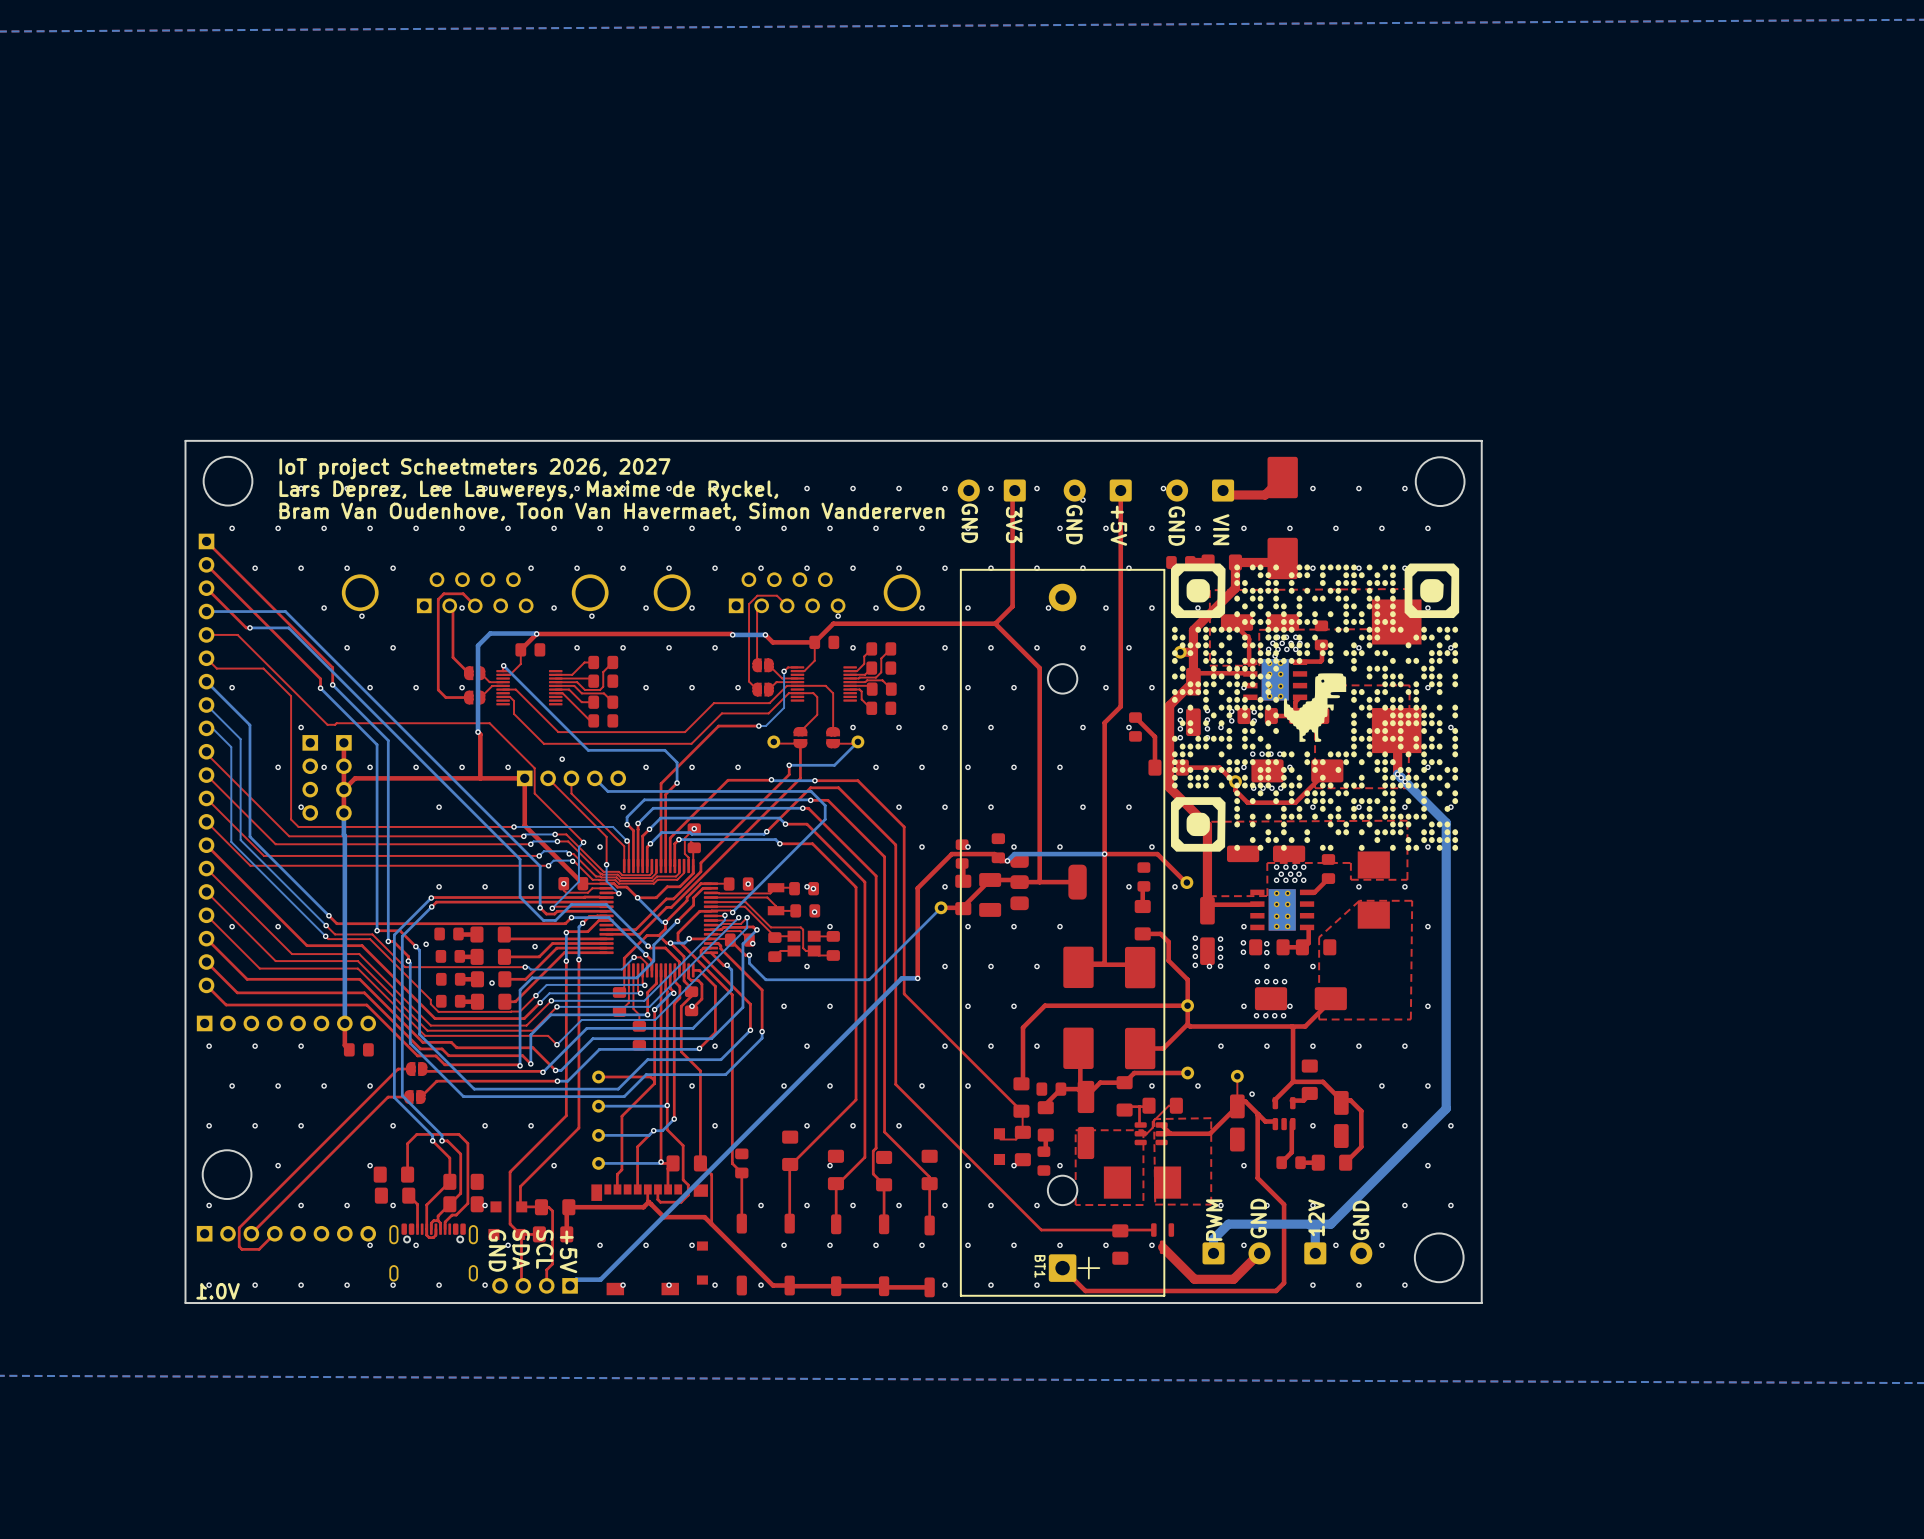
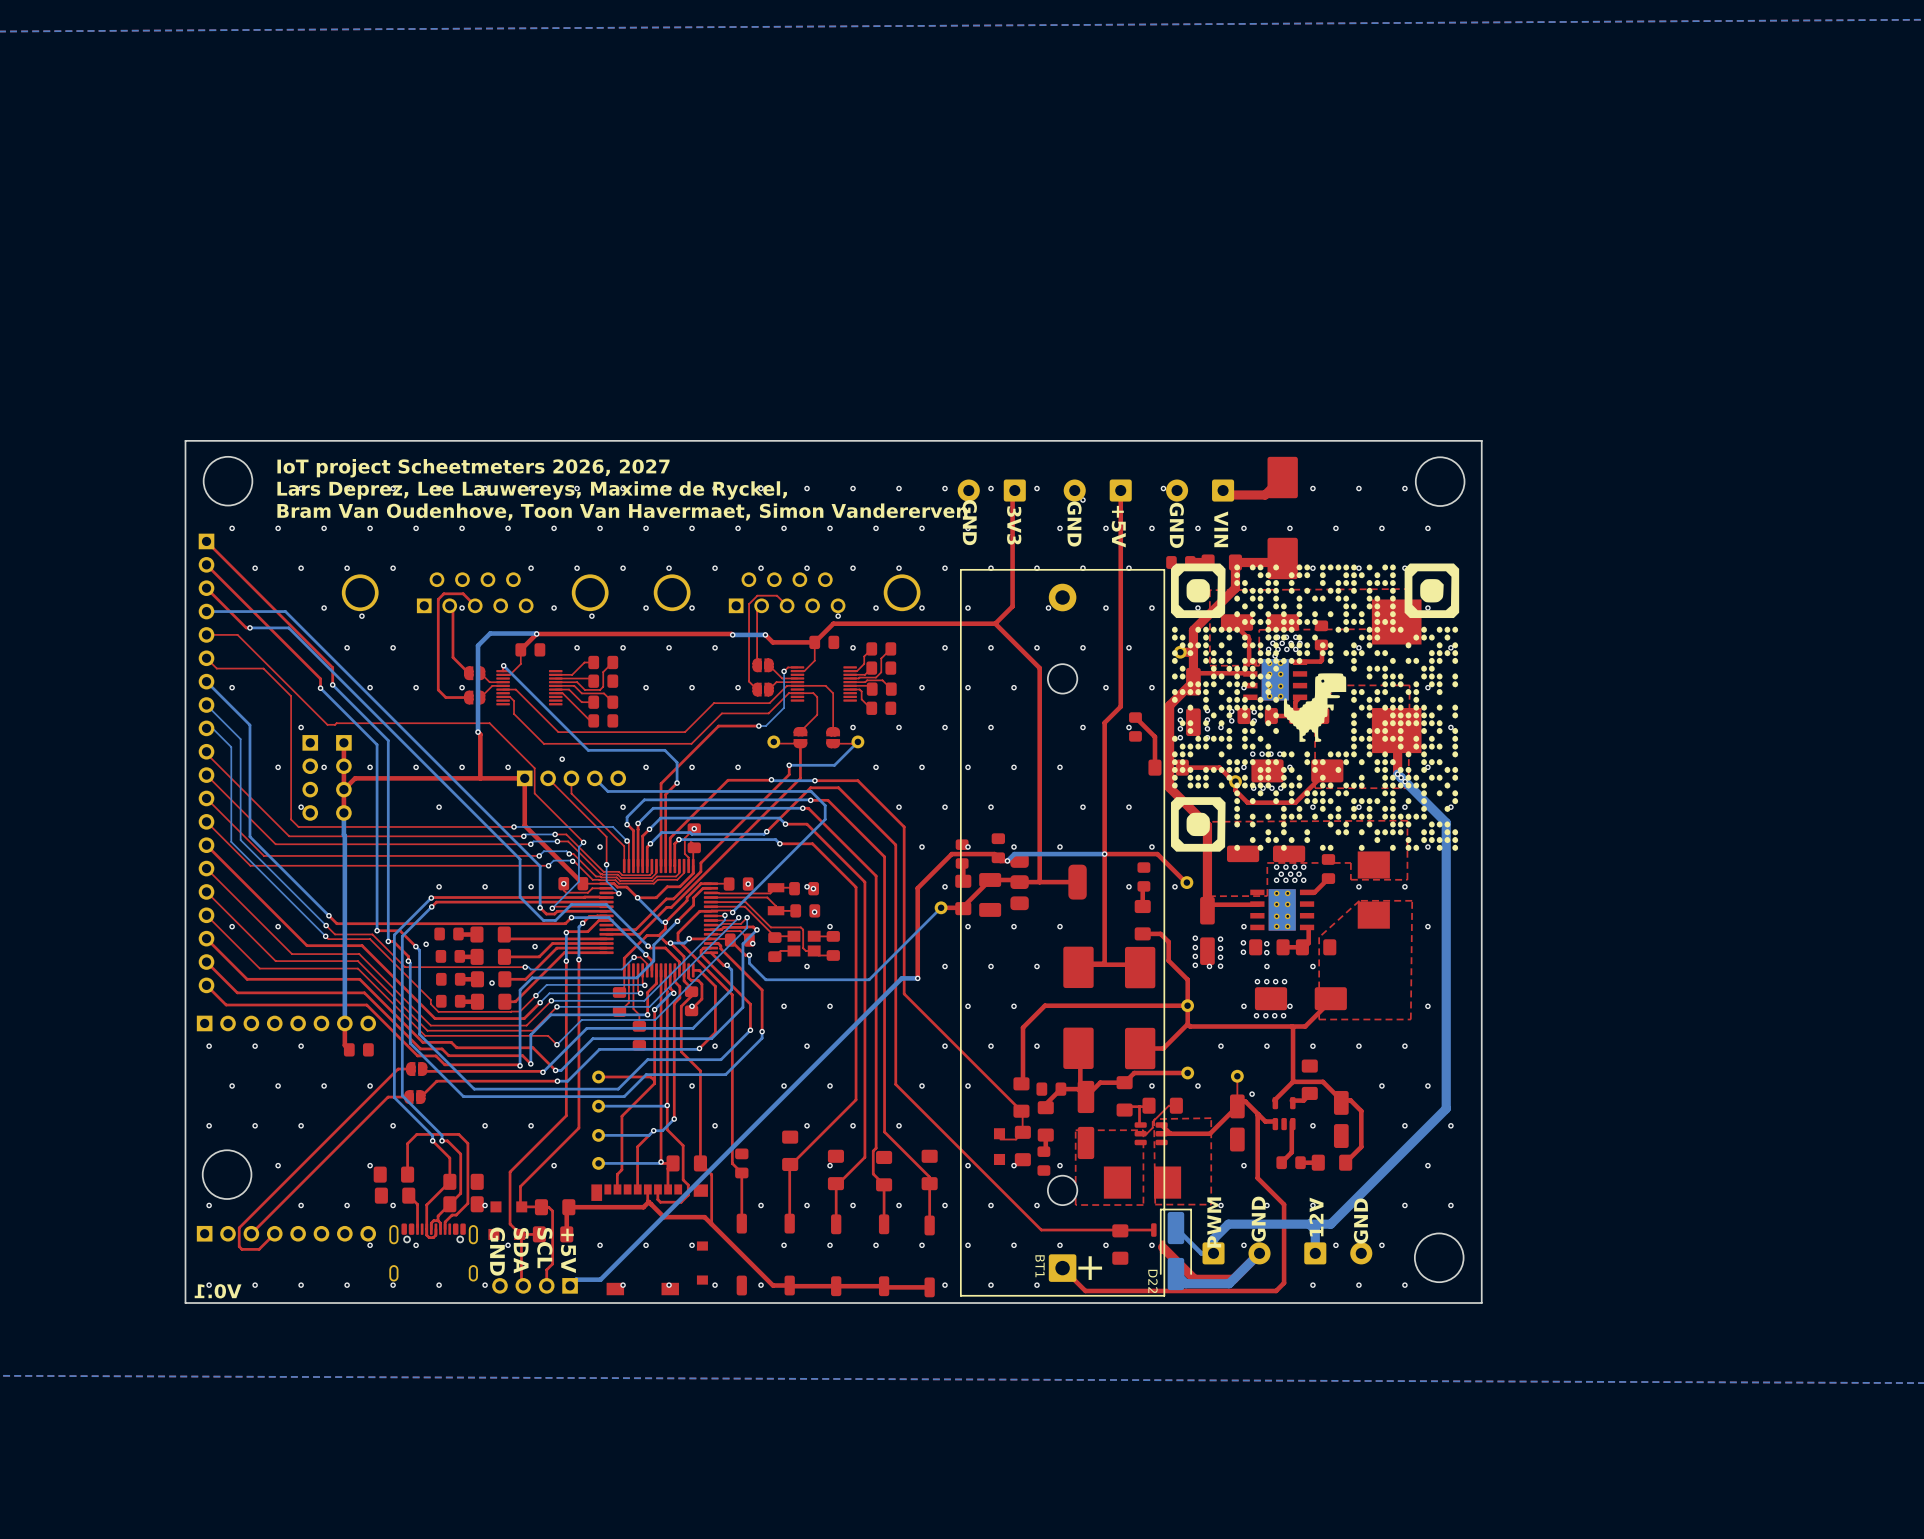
bottom track: none -> (1175, 1228) (1201, 1253) (1213, 1253)
D22: none -> (1175, 1249)
bottom track: none -> (1259, 1253) (1229, 1283) (1185, 1283) (1175, 1274)

